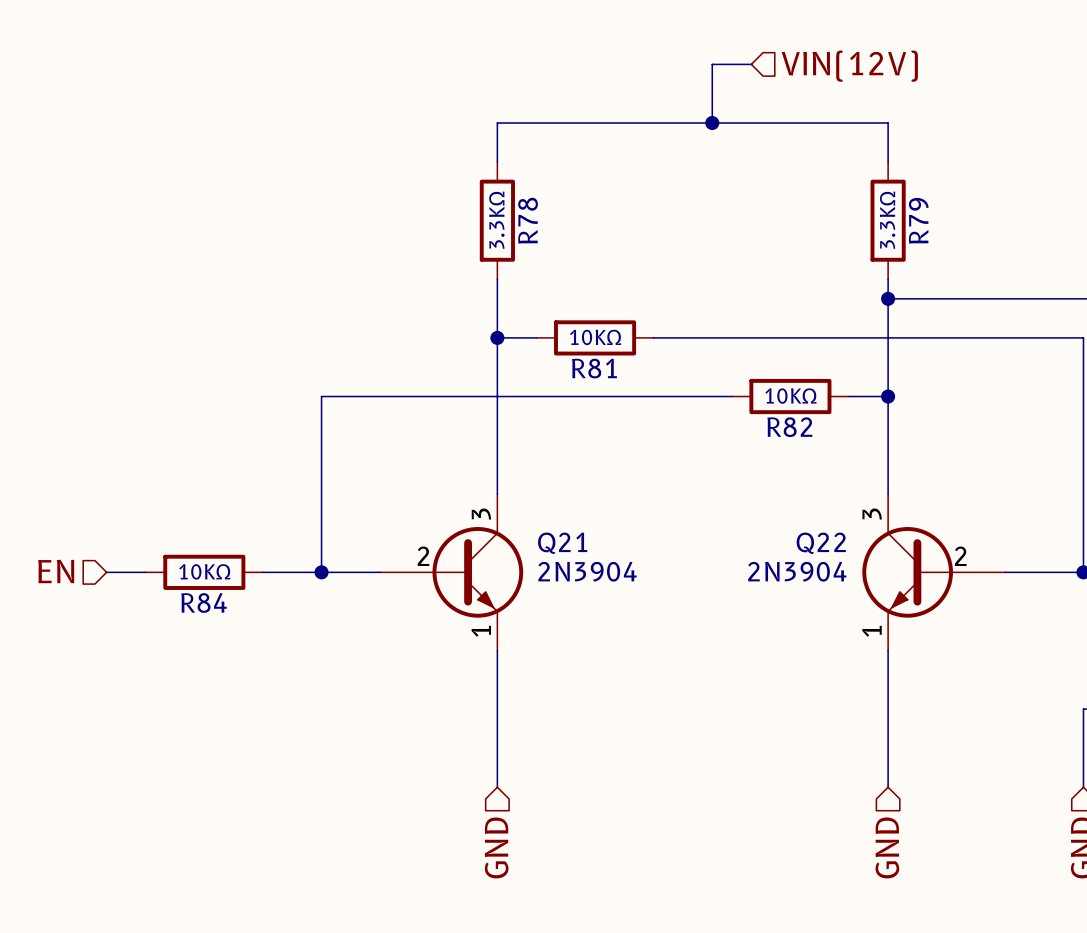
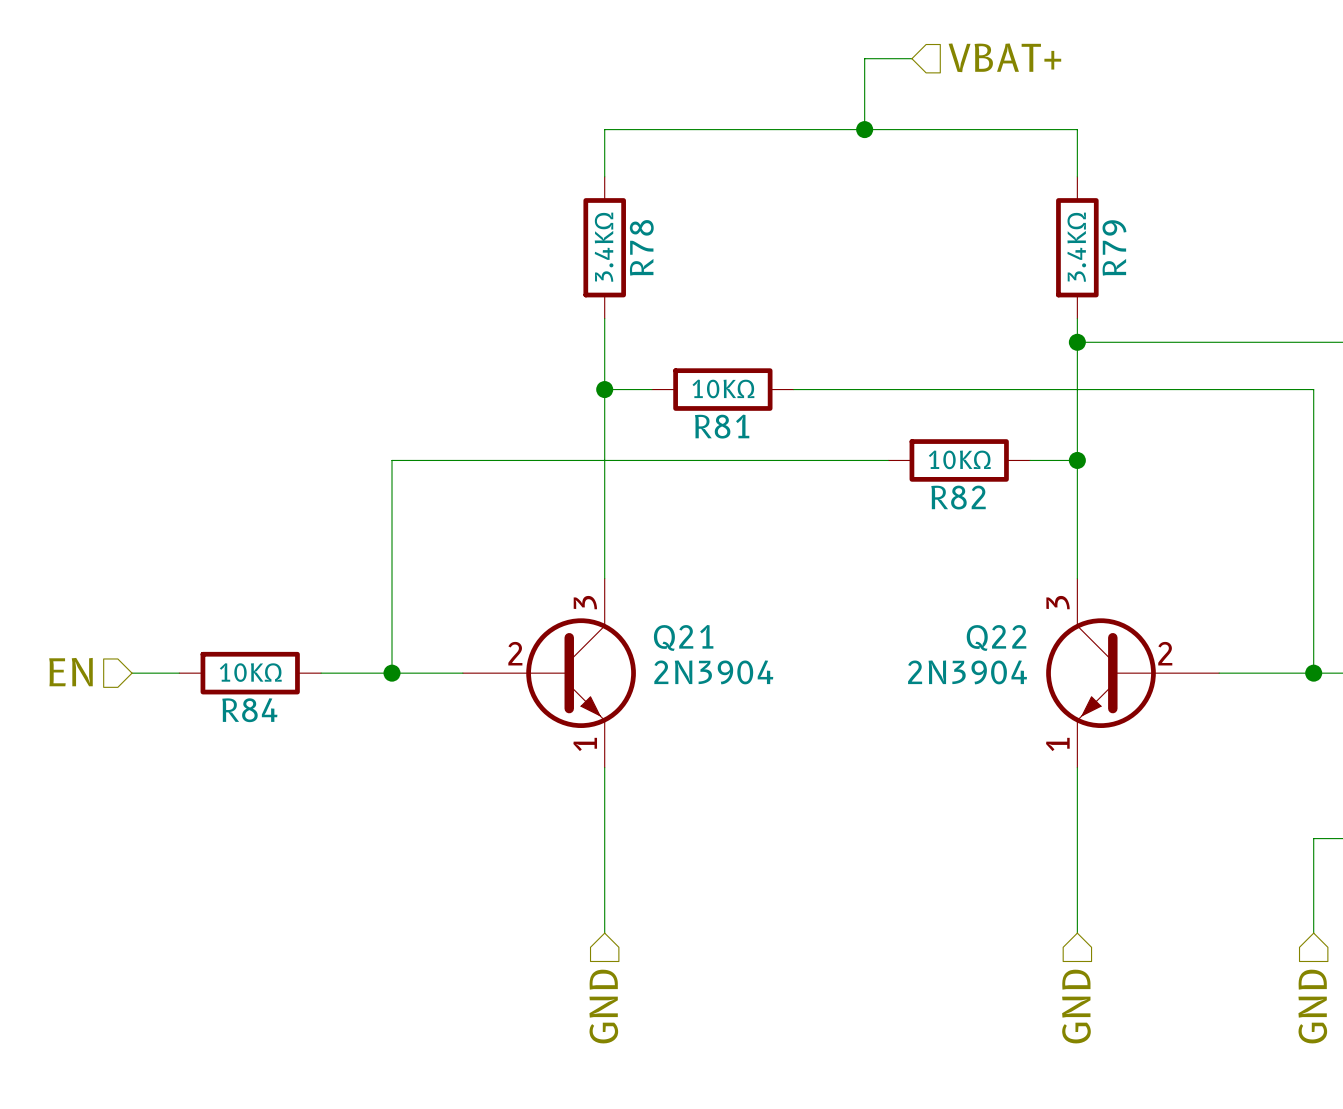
hierarchical label: VIN(12V) (849, 66) -> VBAT+ (1004, 57)
R78 value: 3.3KΩ (496, 220) -> 3.4KΩ (604, 247)
R79 value: 3.3KΩ (887, 220) -> 3.4KΩ (1076, 247)

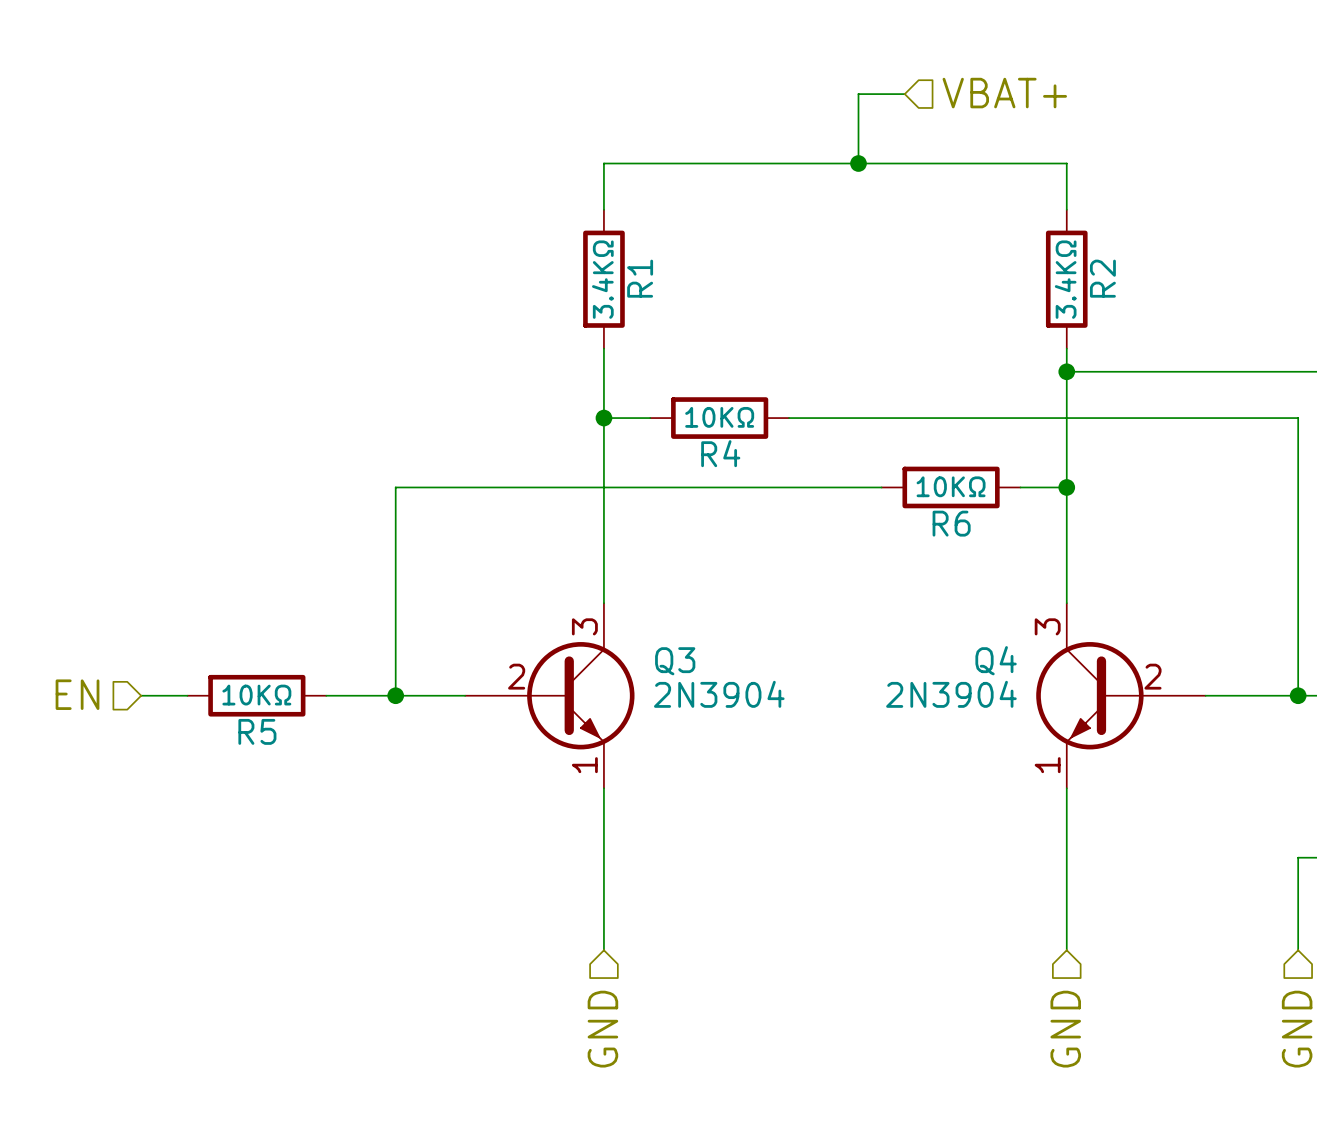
R78 name: R78 (641, 247) -> R1 (640, 278)
R79 name: R79 (1114, 247) -> R2 (1102, 278)
R81 name: R81 (722, 426) -> R4 (720, 453)
R82 name: R82 (958, 497) -> R6 (951, 523)
Q21 name: Q21 (683, 637) -> Q3 (675, 661)
Q22 name: Q22 (996, 637) -> Q4 (996, 660)
R84 name: R84 (249, 710) -> R5 (257, 731)

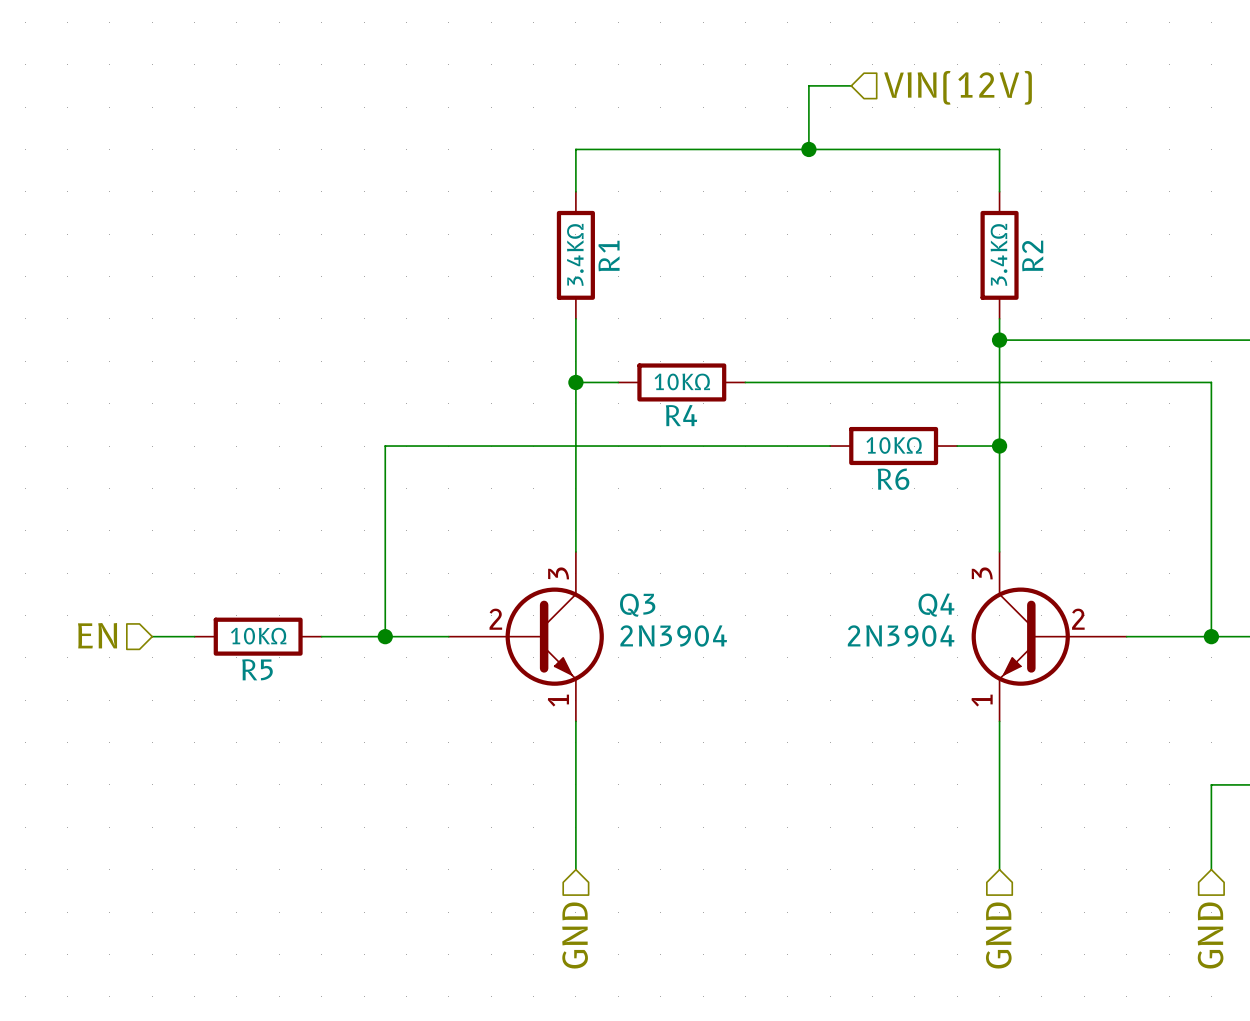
hierarchical label: VBAT+ (1004, 93) -> VIN(12V) (958, 87)

